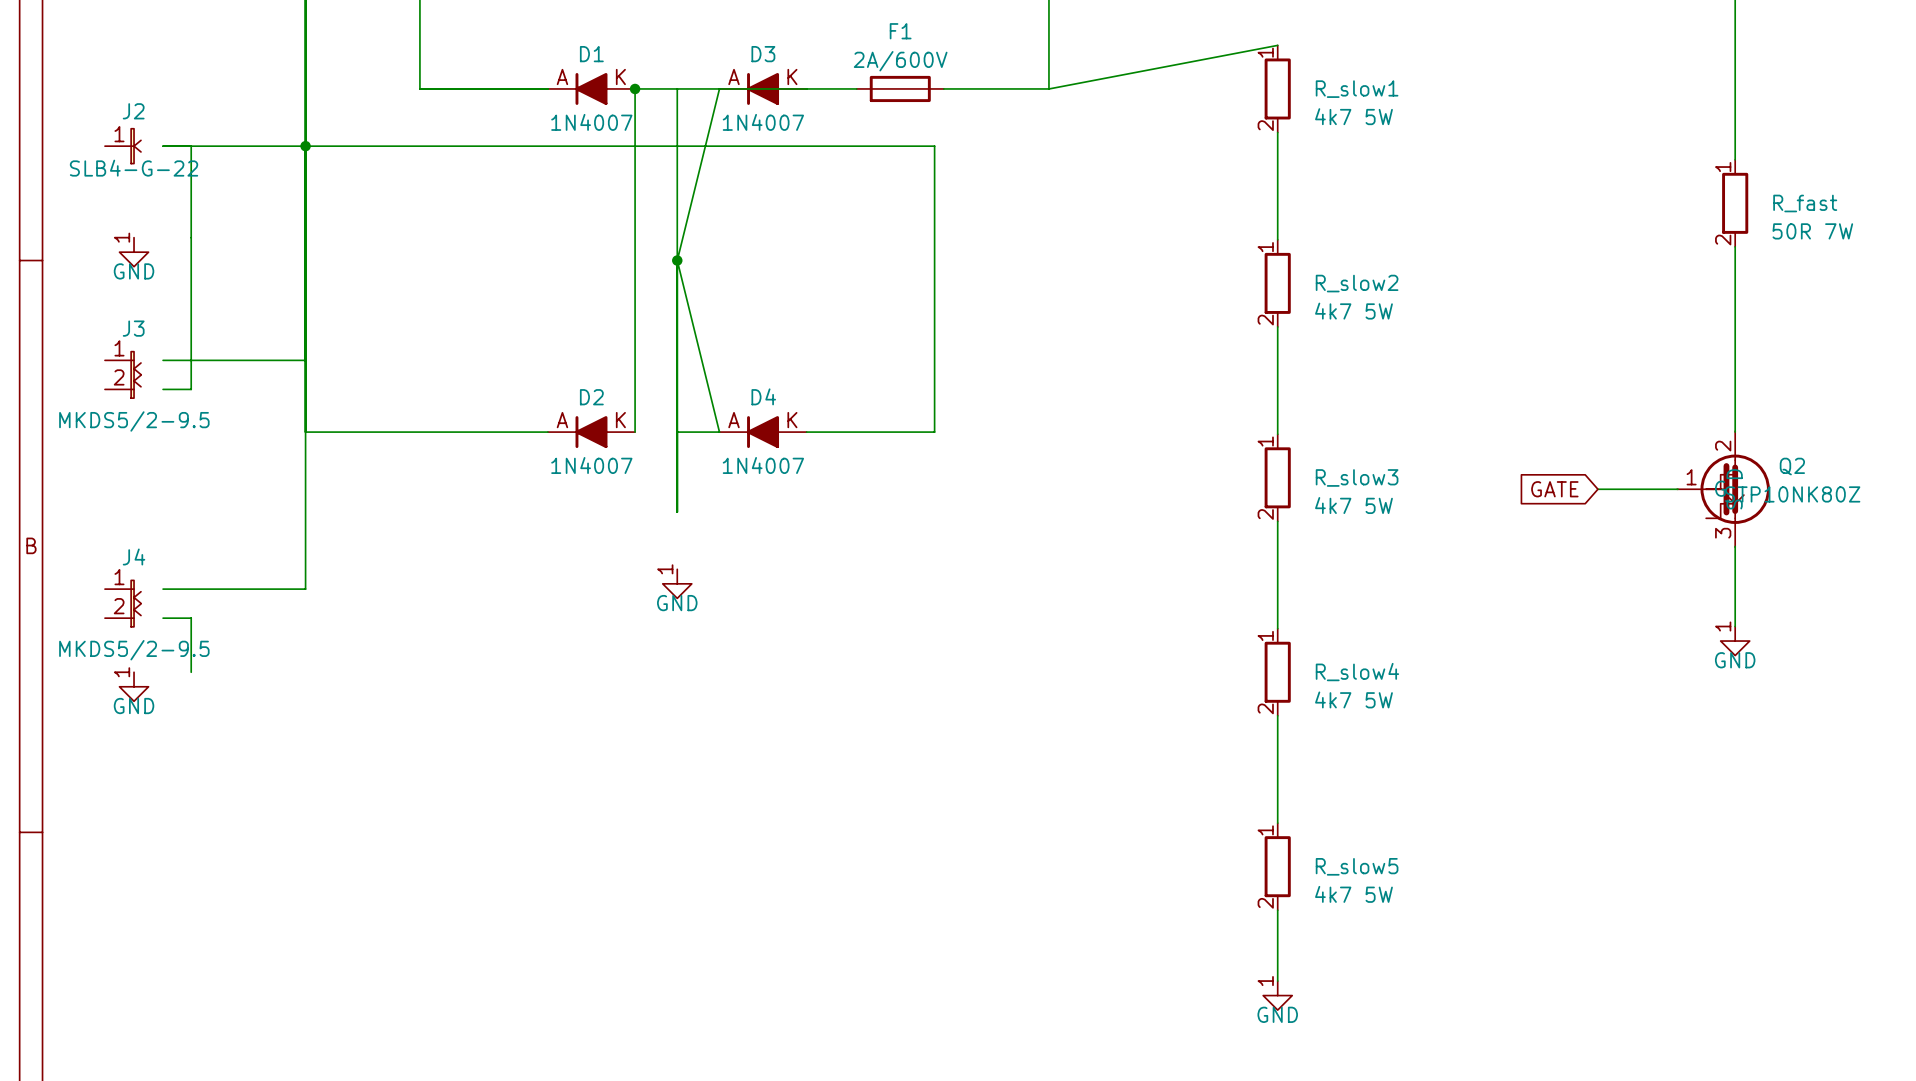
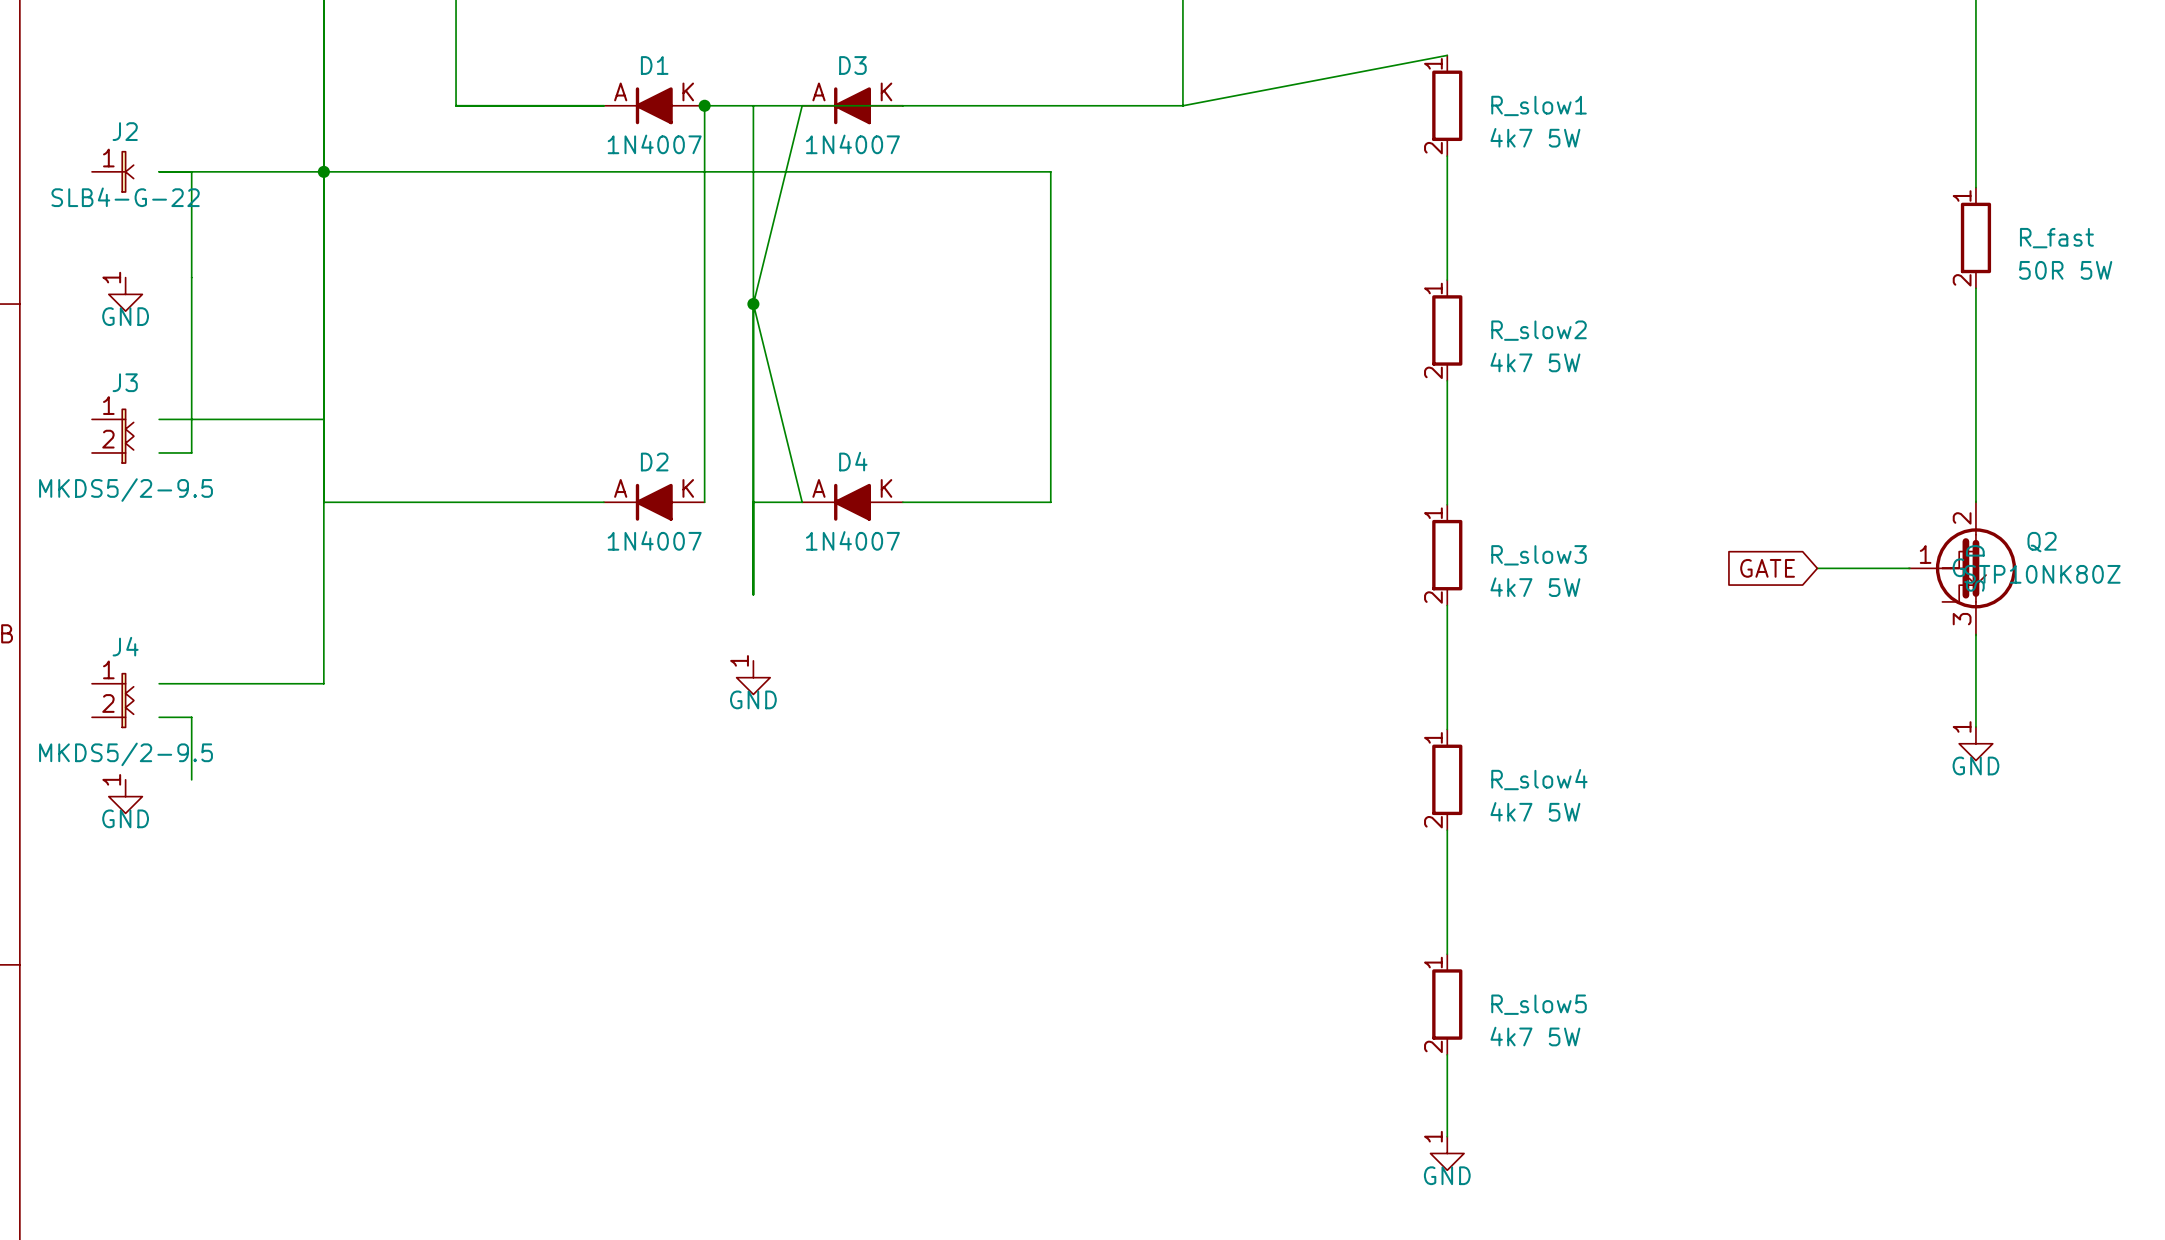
F1: 2A/600V (900, 88) -> none
R_fast value: 50R 7W (1812, 231) -> 50R 5W (2065, 270)

